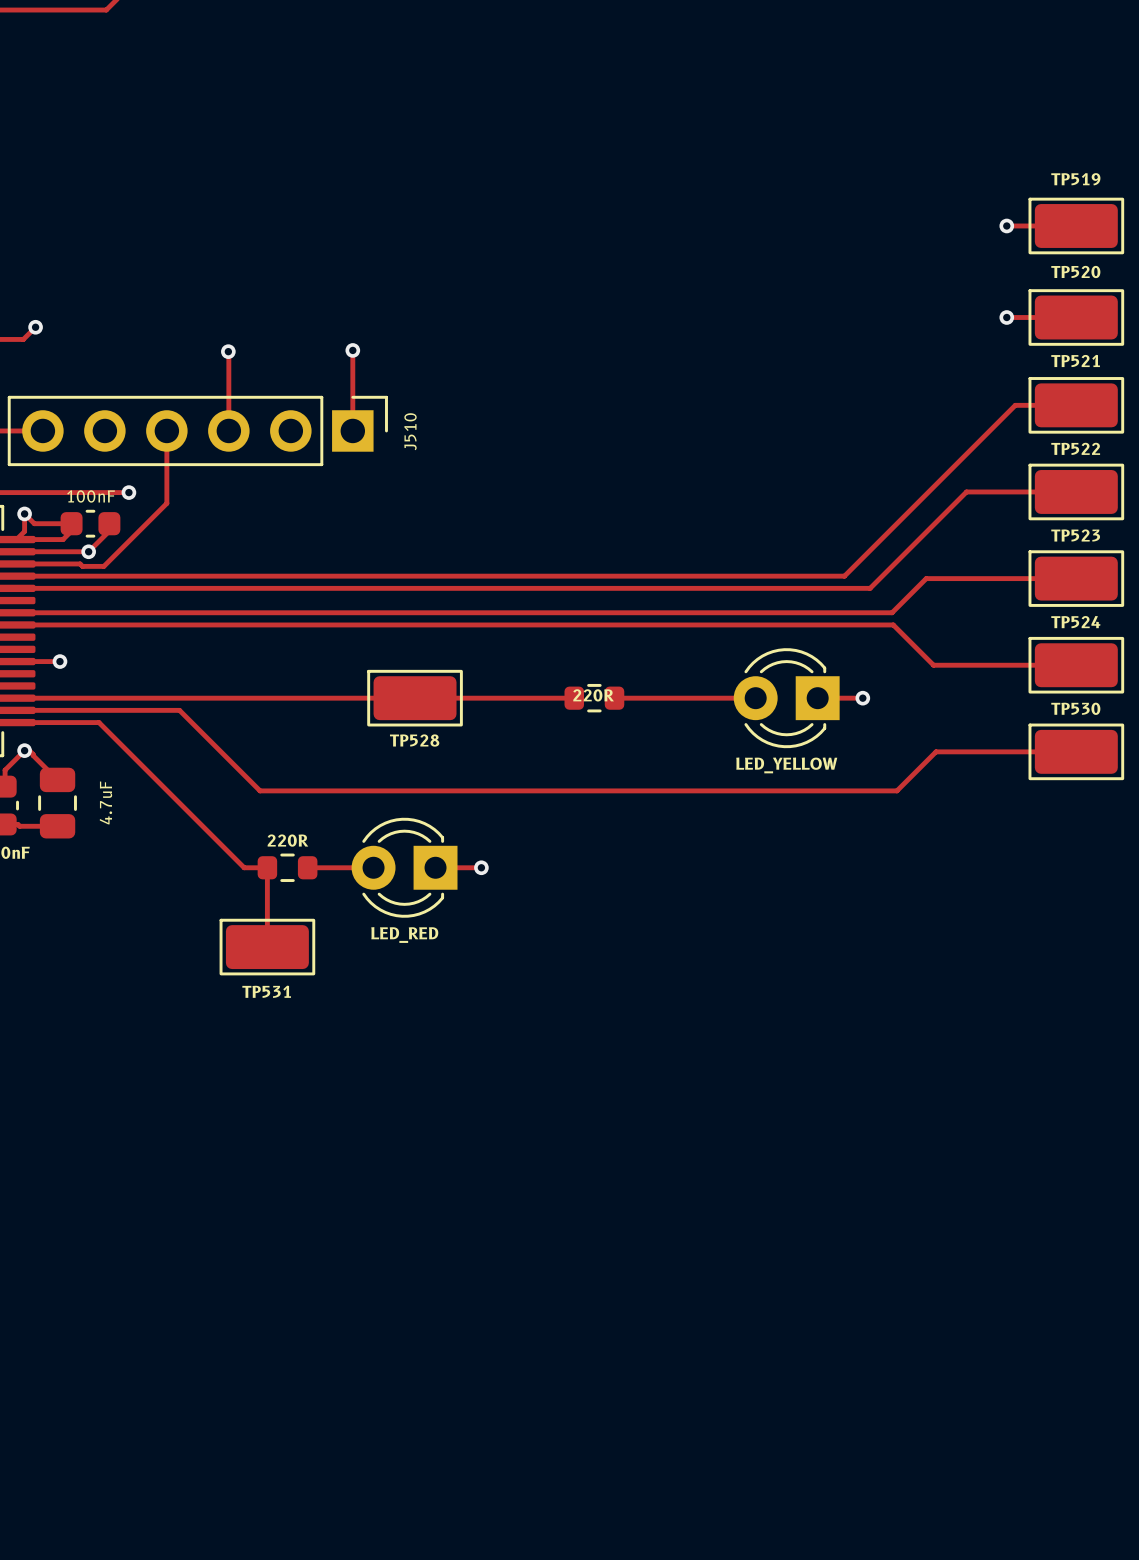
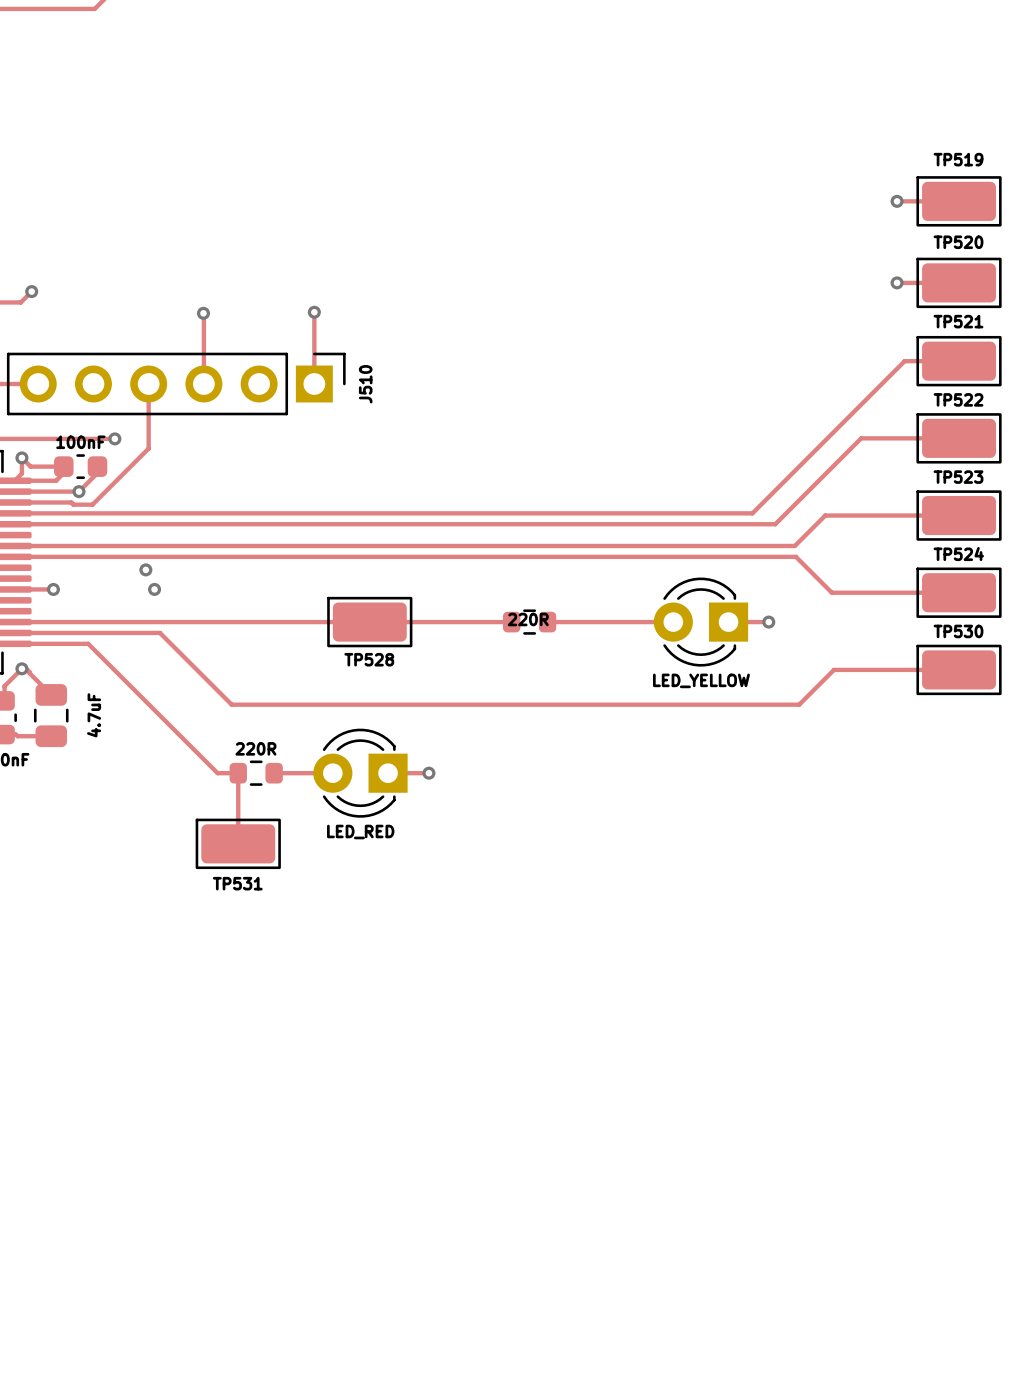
via: none -> (145, 569)
via: none -> (154, 589)

